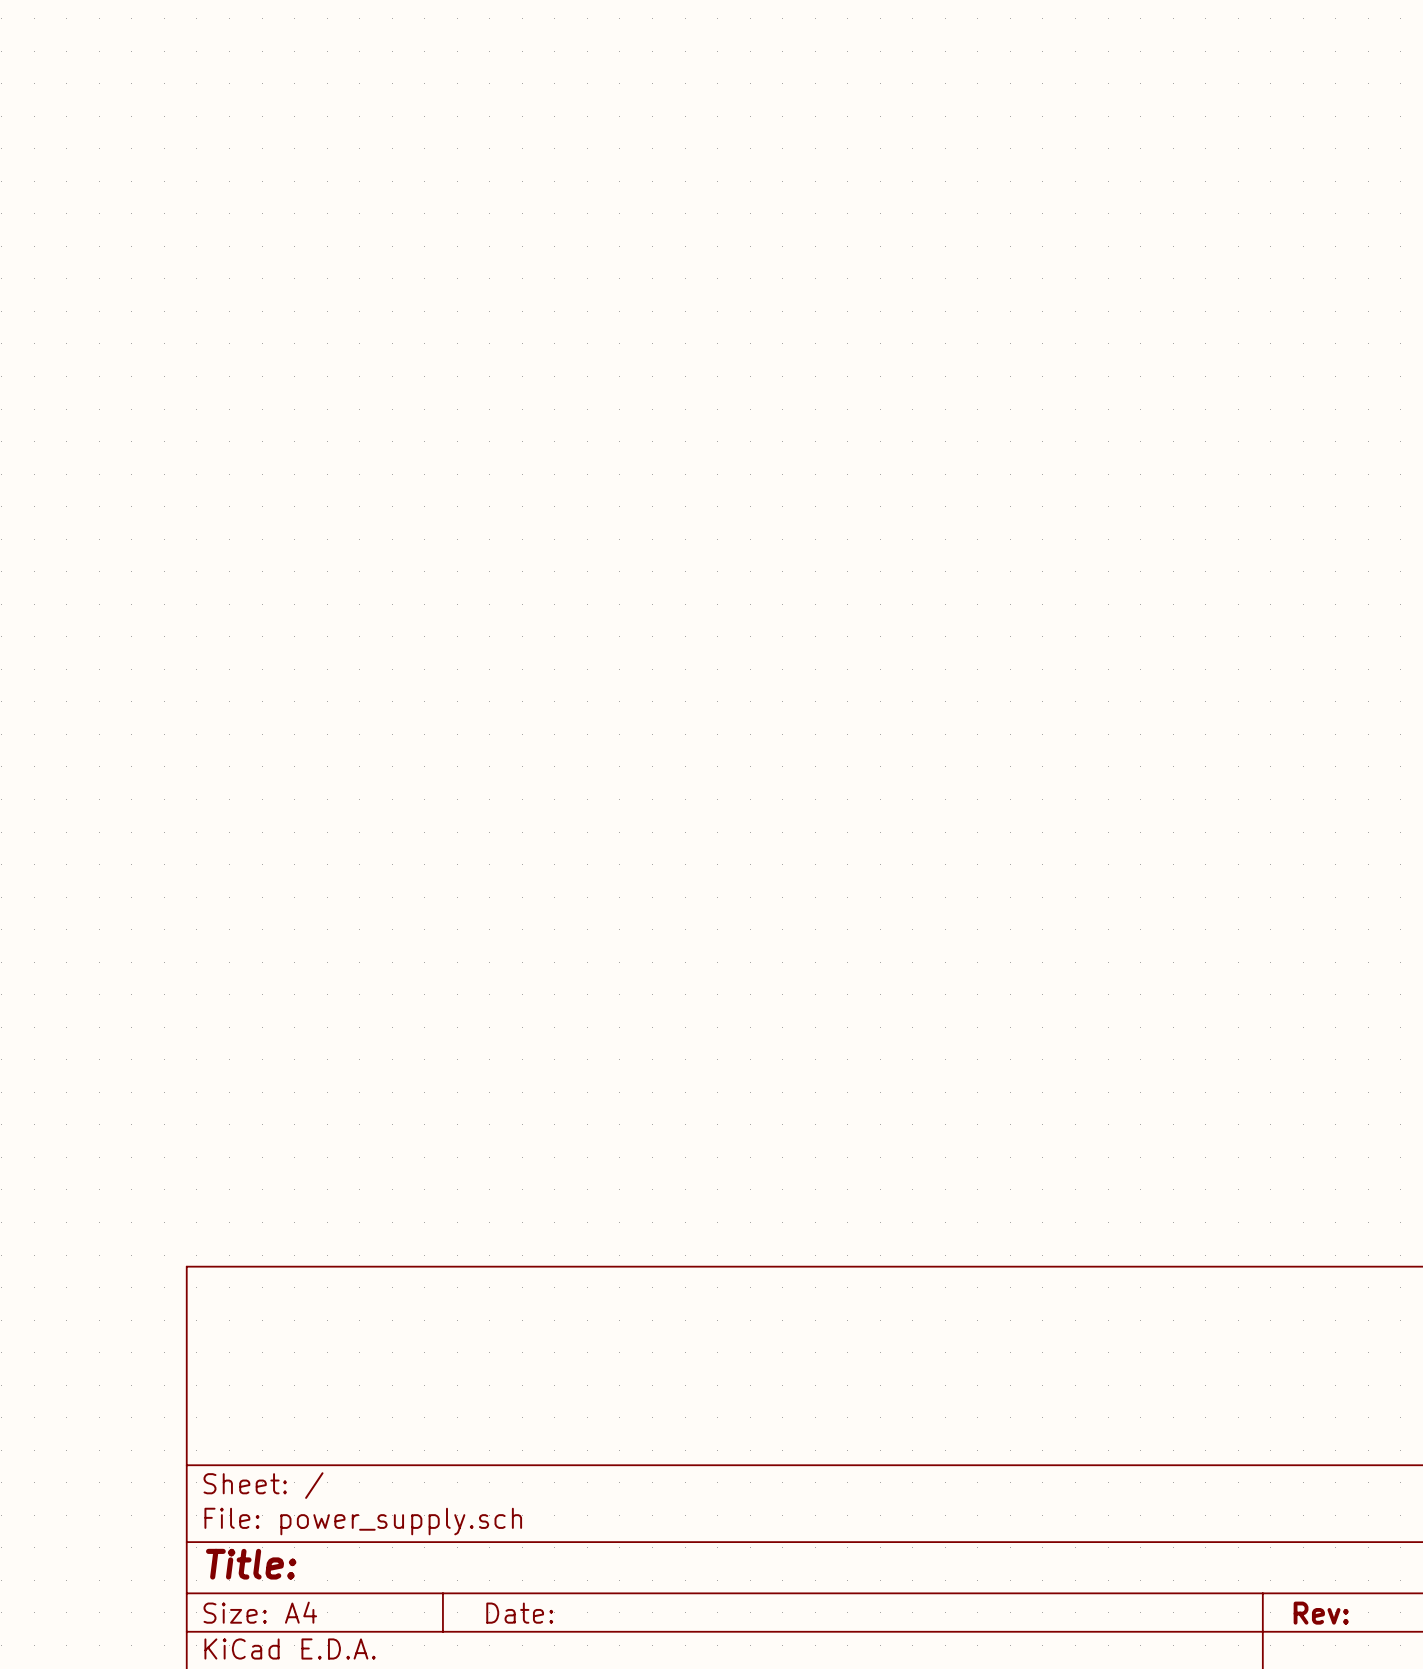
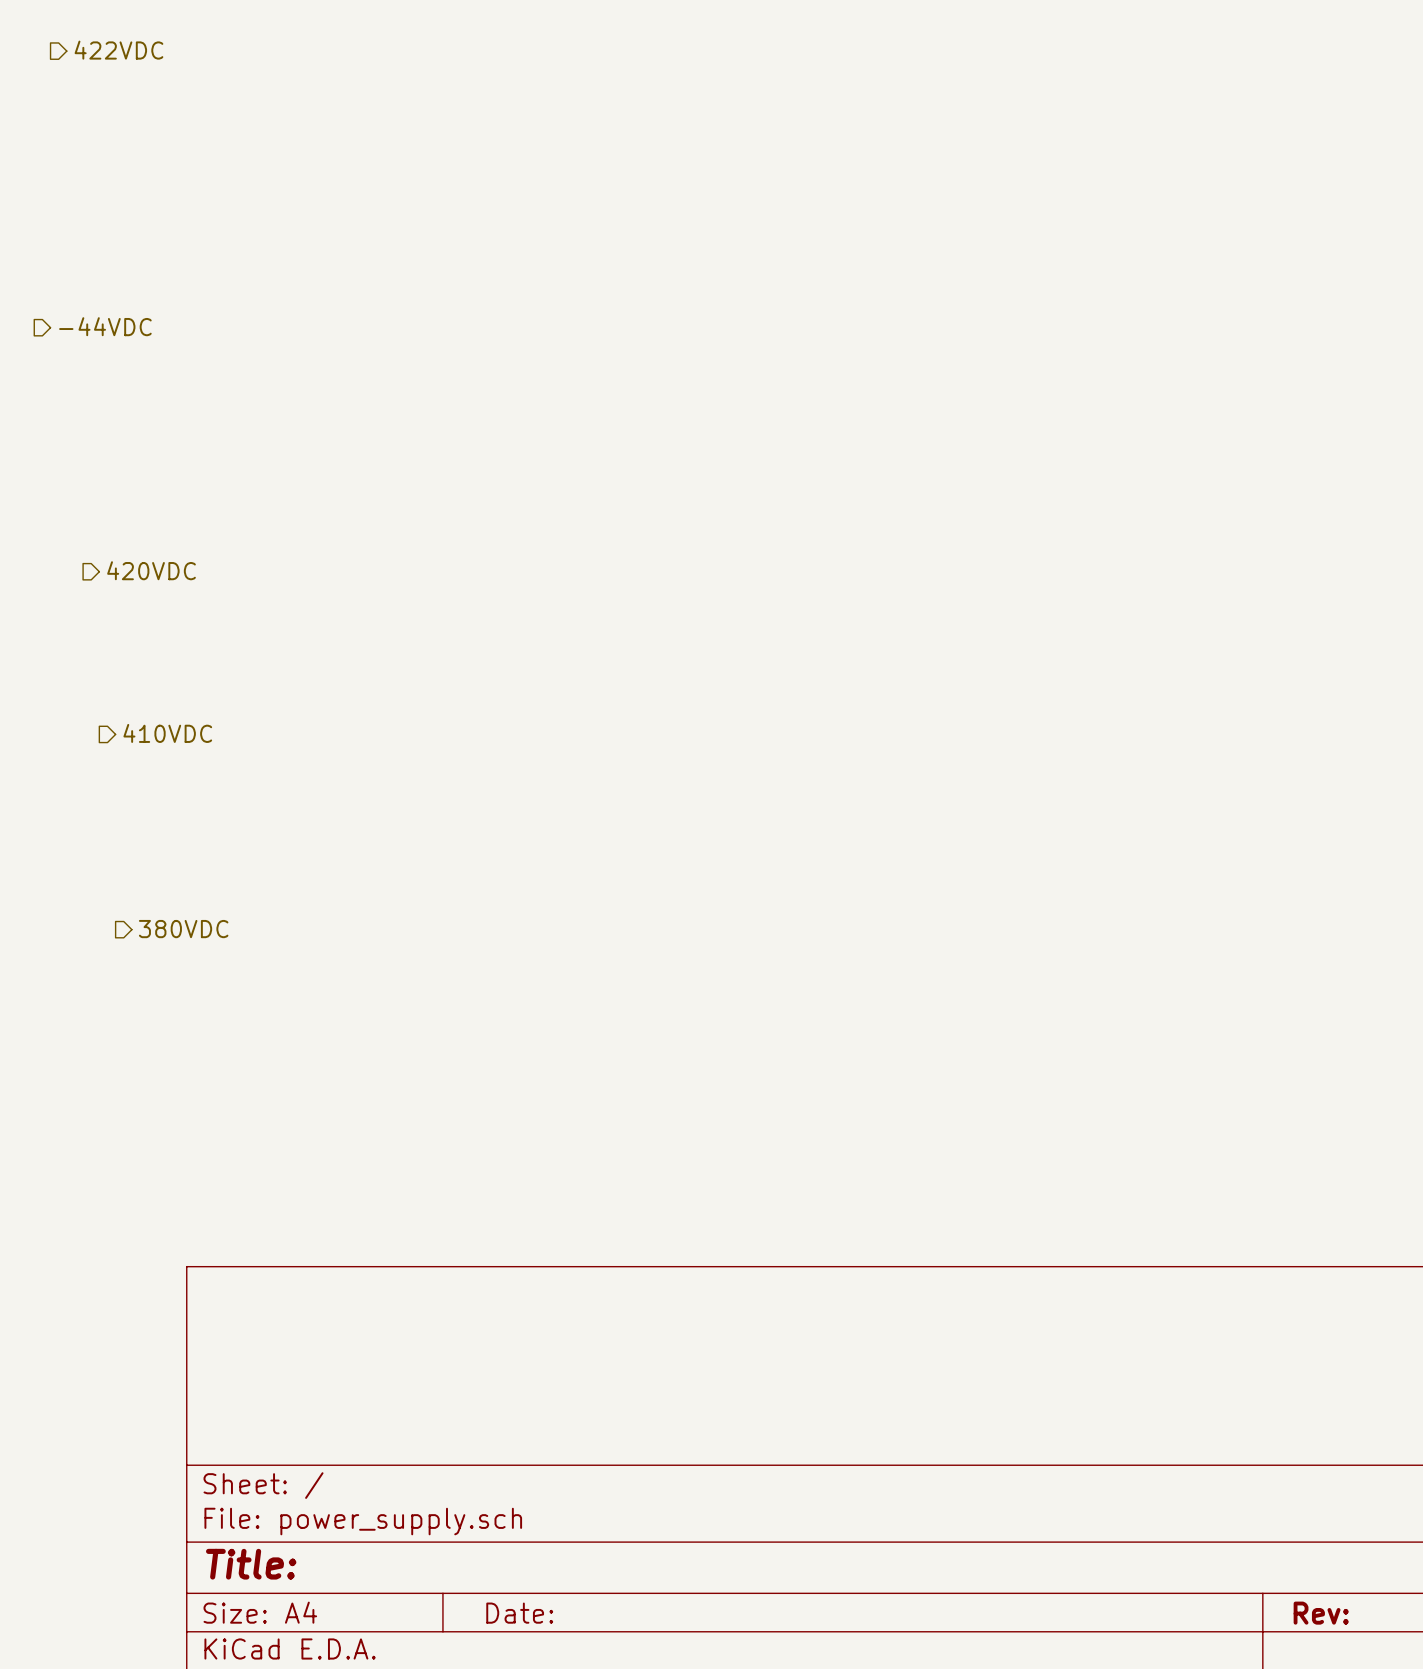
hierarchical label: none -> 422VDC (118, 50)
hierarchical label: none -> -44VDC (105, 326)
hierarchical label: none -> 420VDC (151, 570)
hierarchical label: none -> 410VDC (167, 733)
hierarchical label: none -> 380VDC (183, 929)

